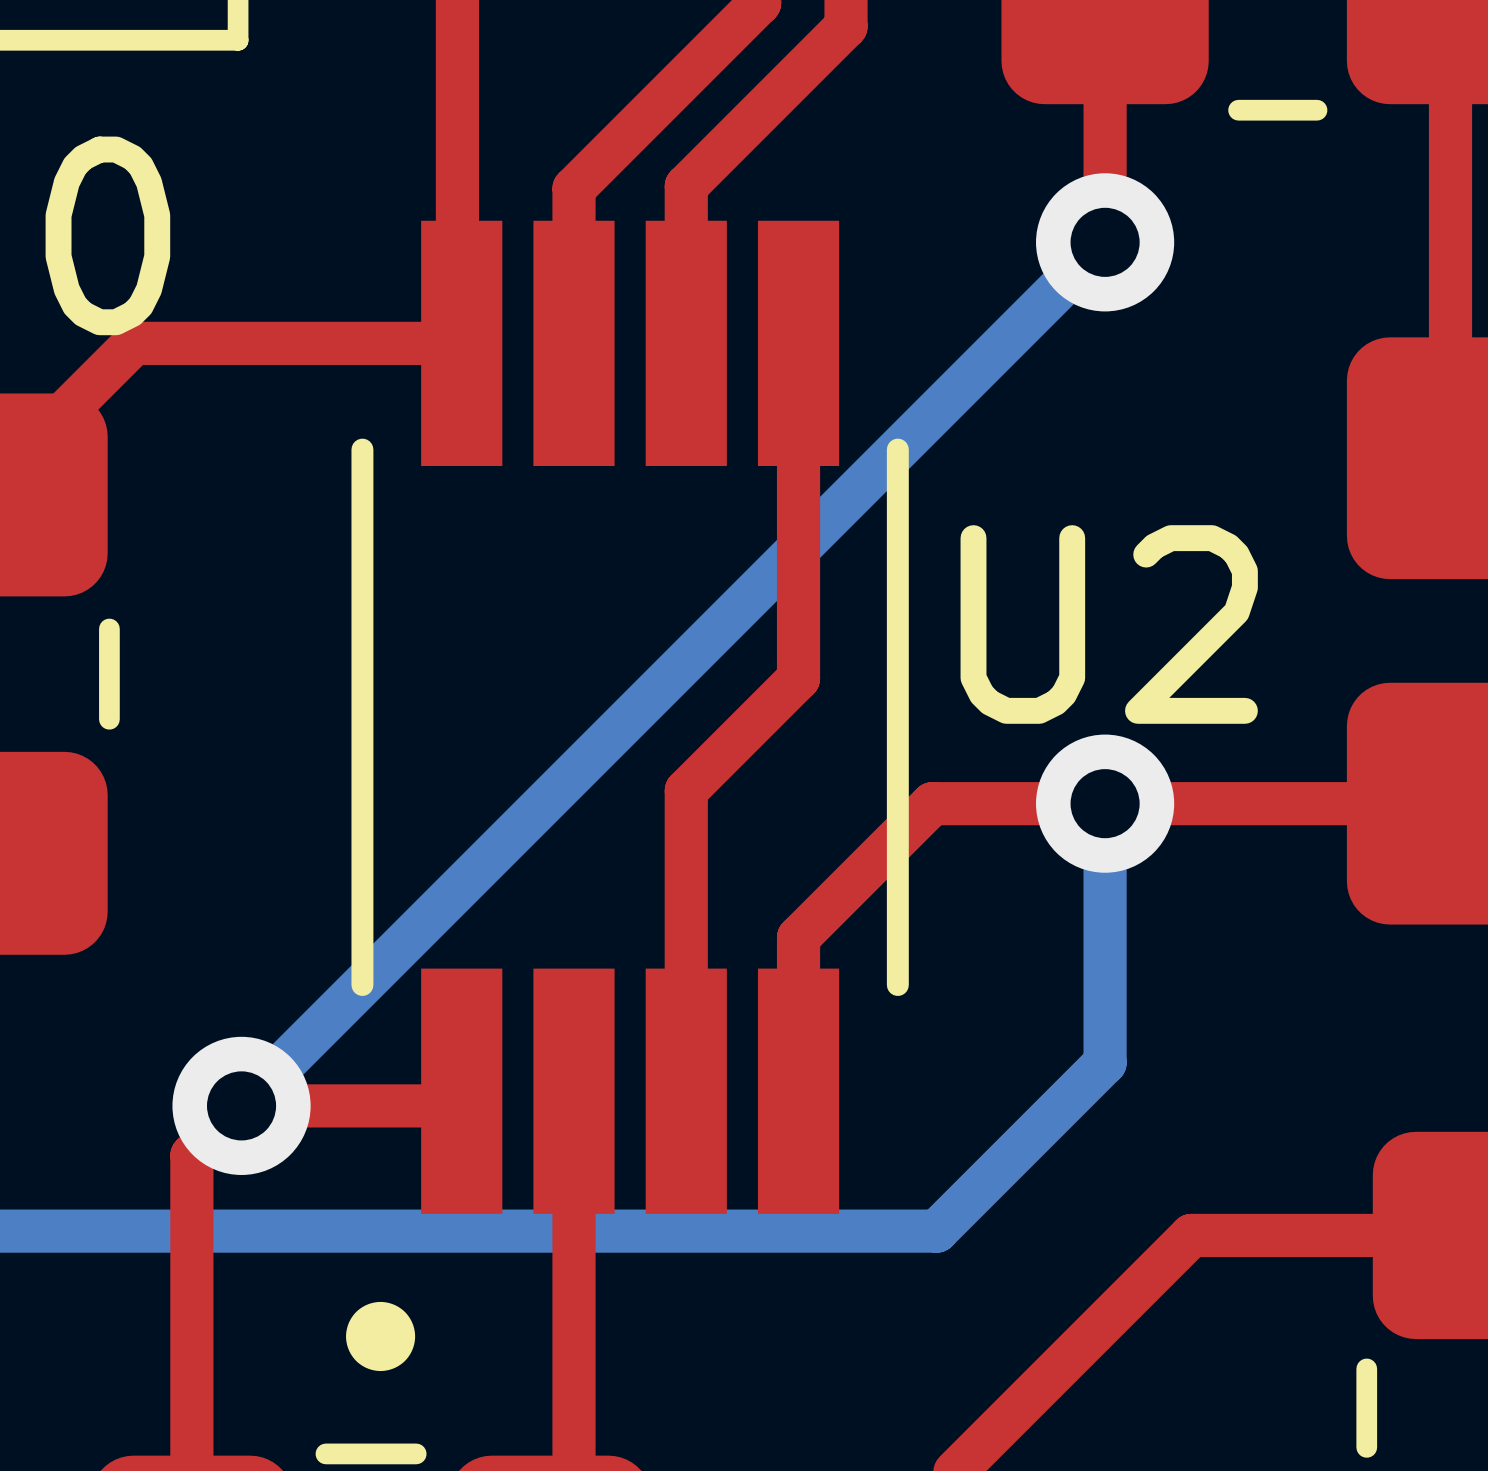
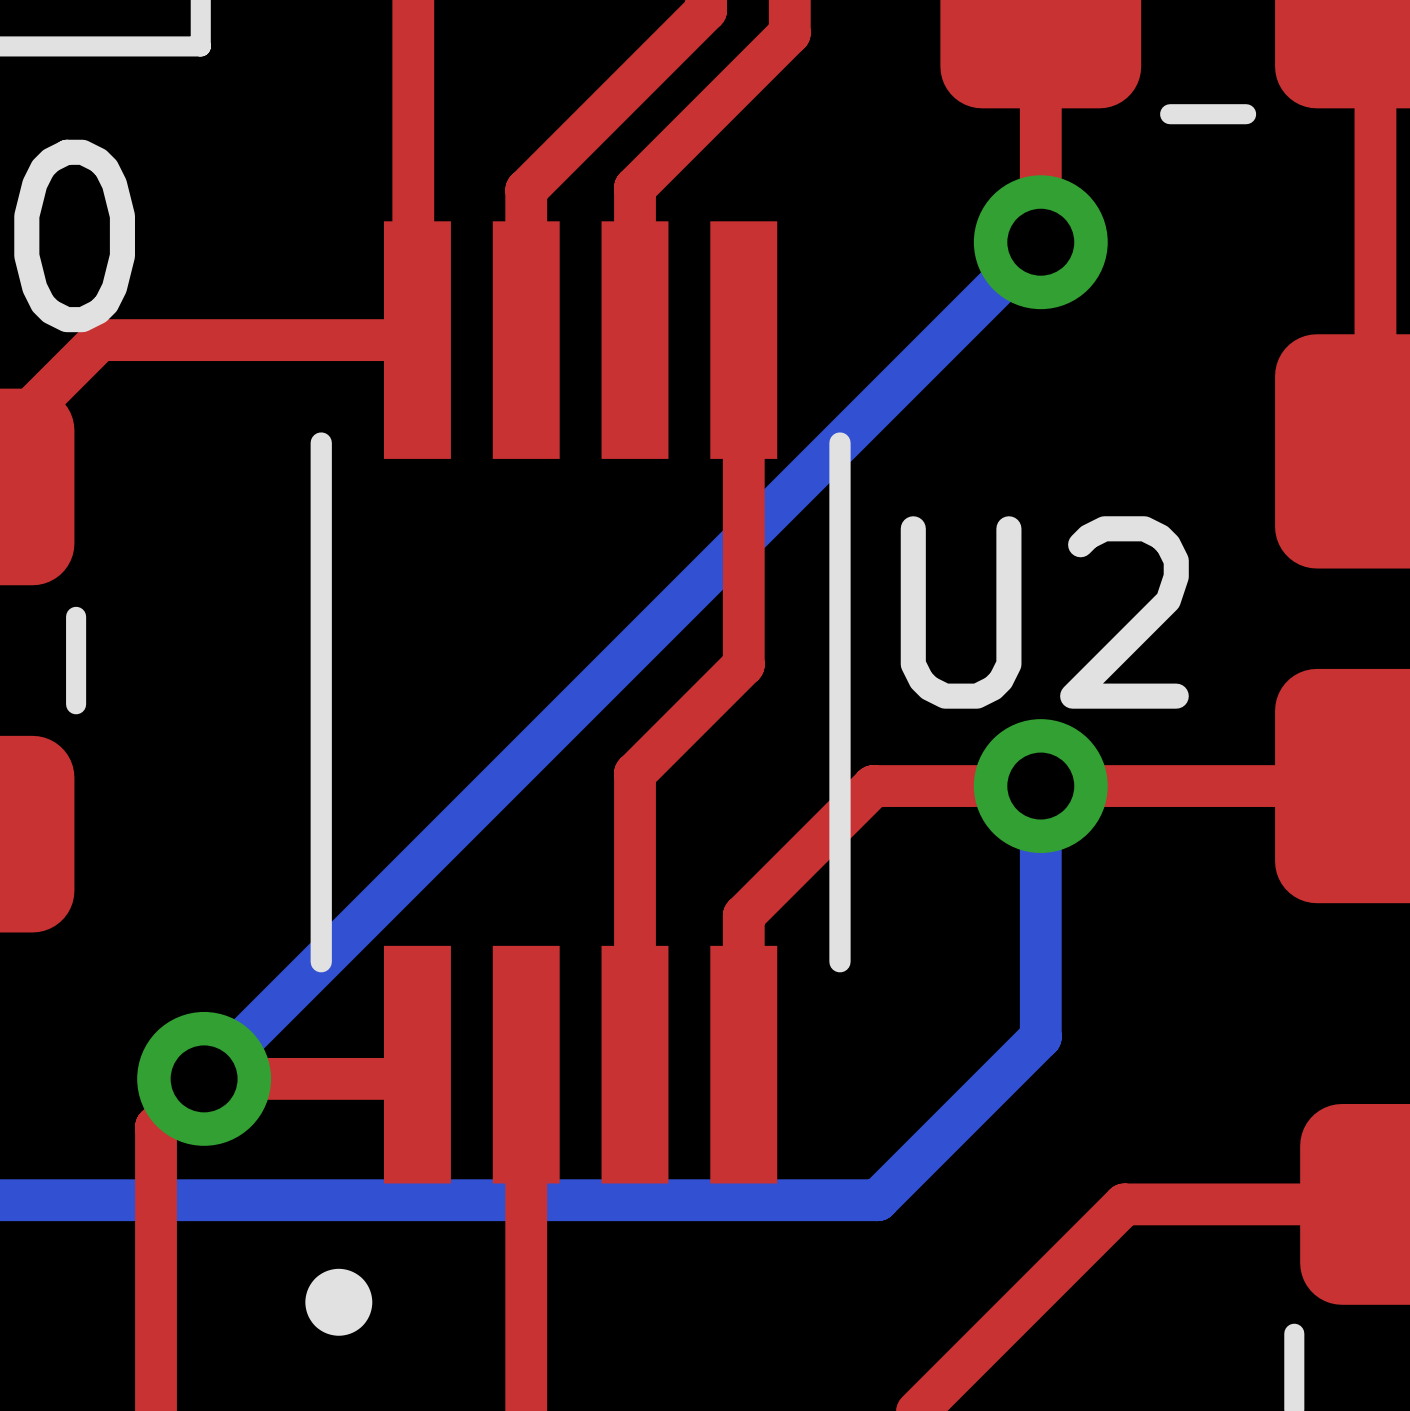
U2 footprint: [346, 220, 909, 1372] -> [305, 221, 851, 1336]

